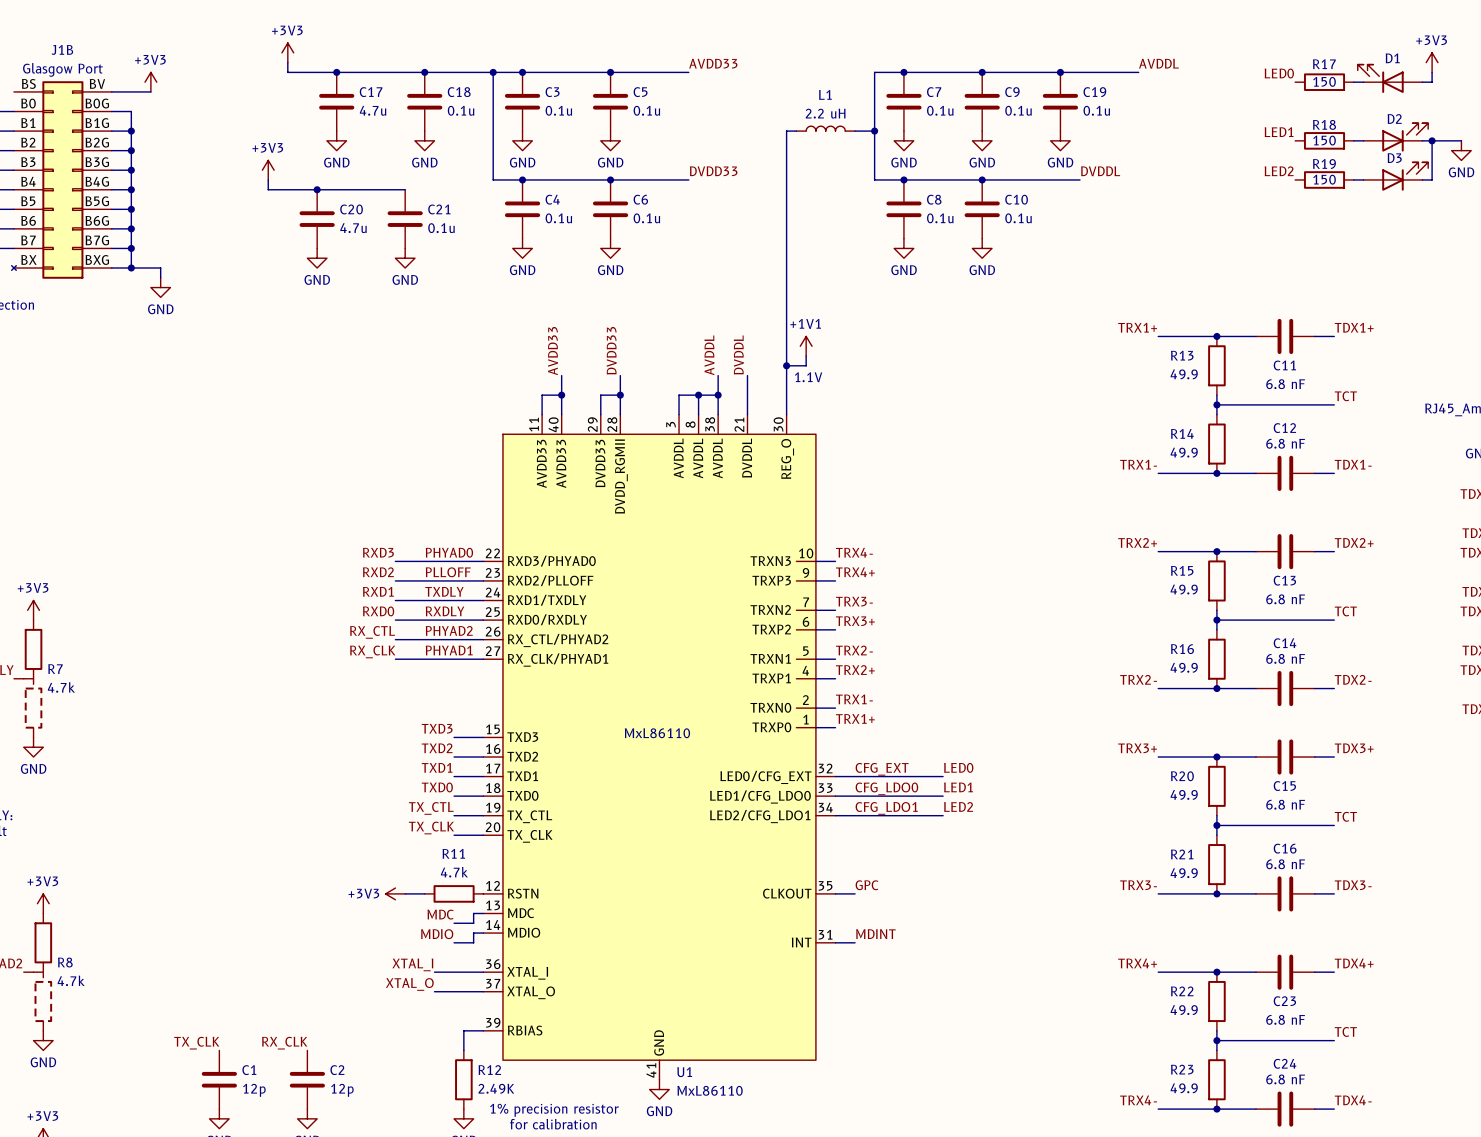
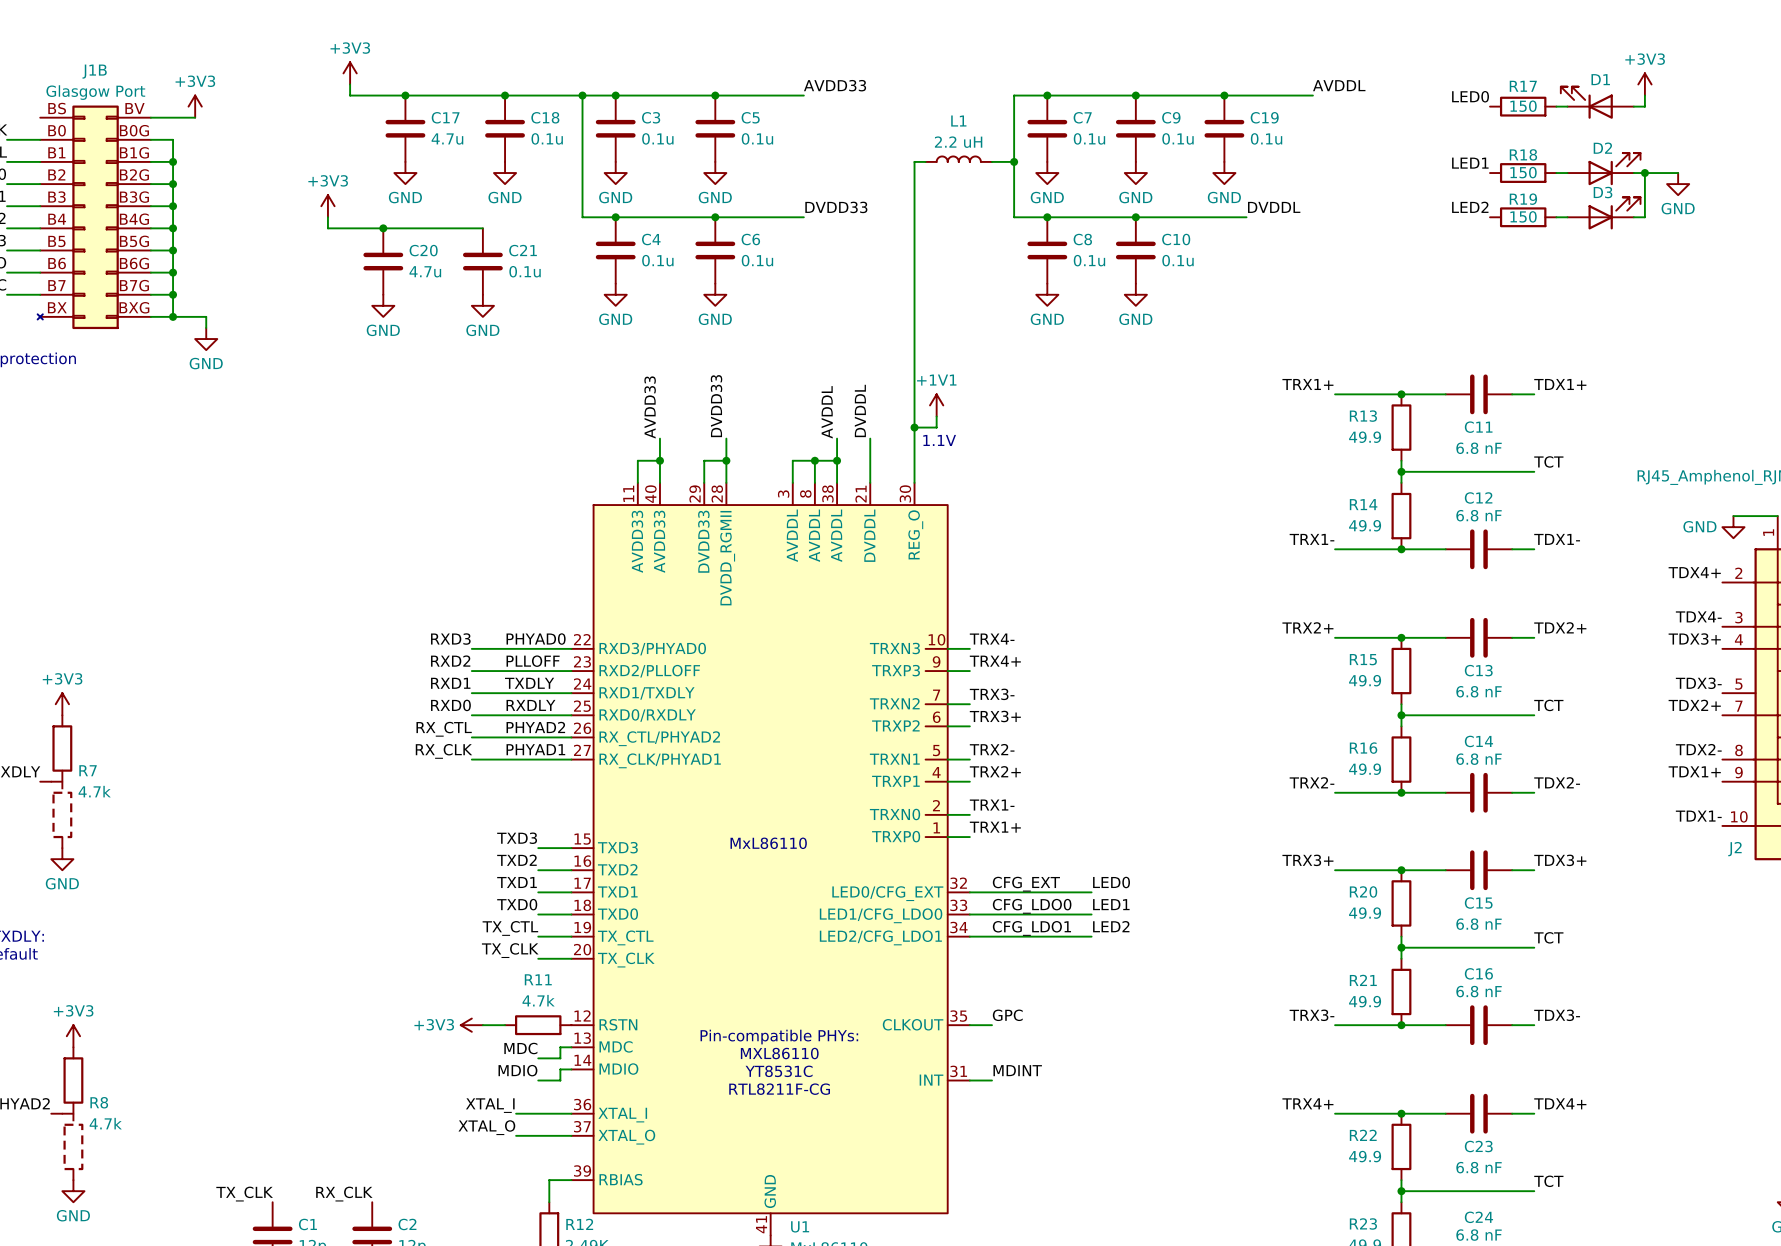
text: none -> Pin-compatible PHYs: (779, 1037)
text: none -> MXL86110 (779, 1053)
text: none -> YT8531C (779, 1071)
text: none -> RTL8211F-CG (779, 1089)

